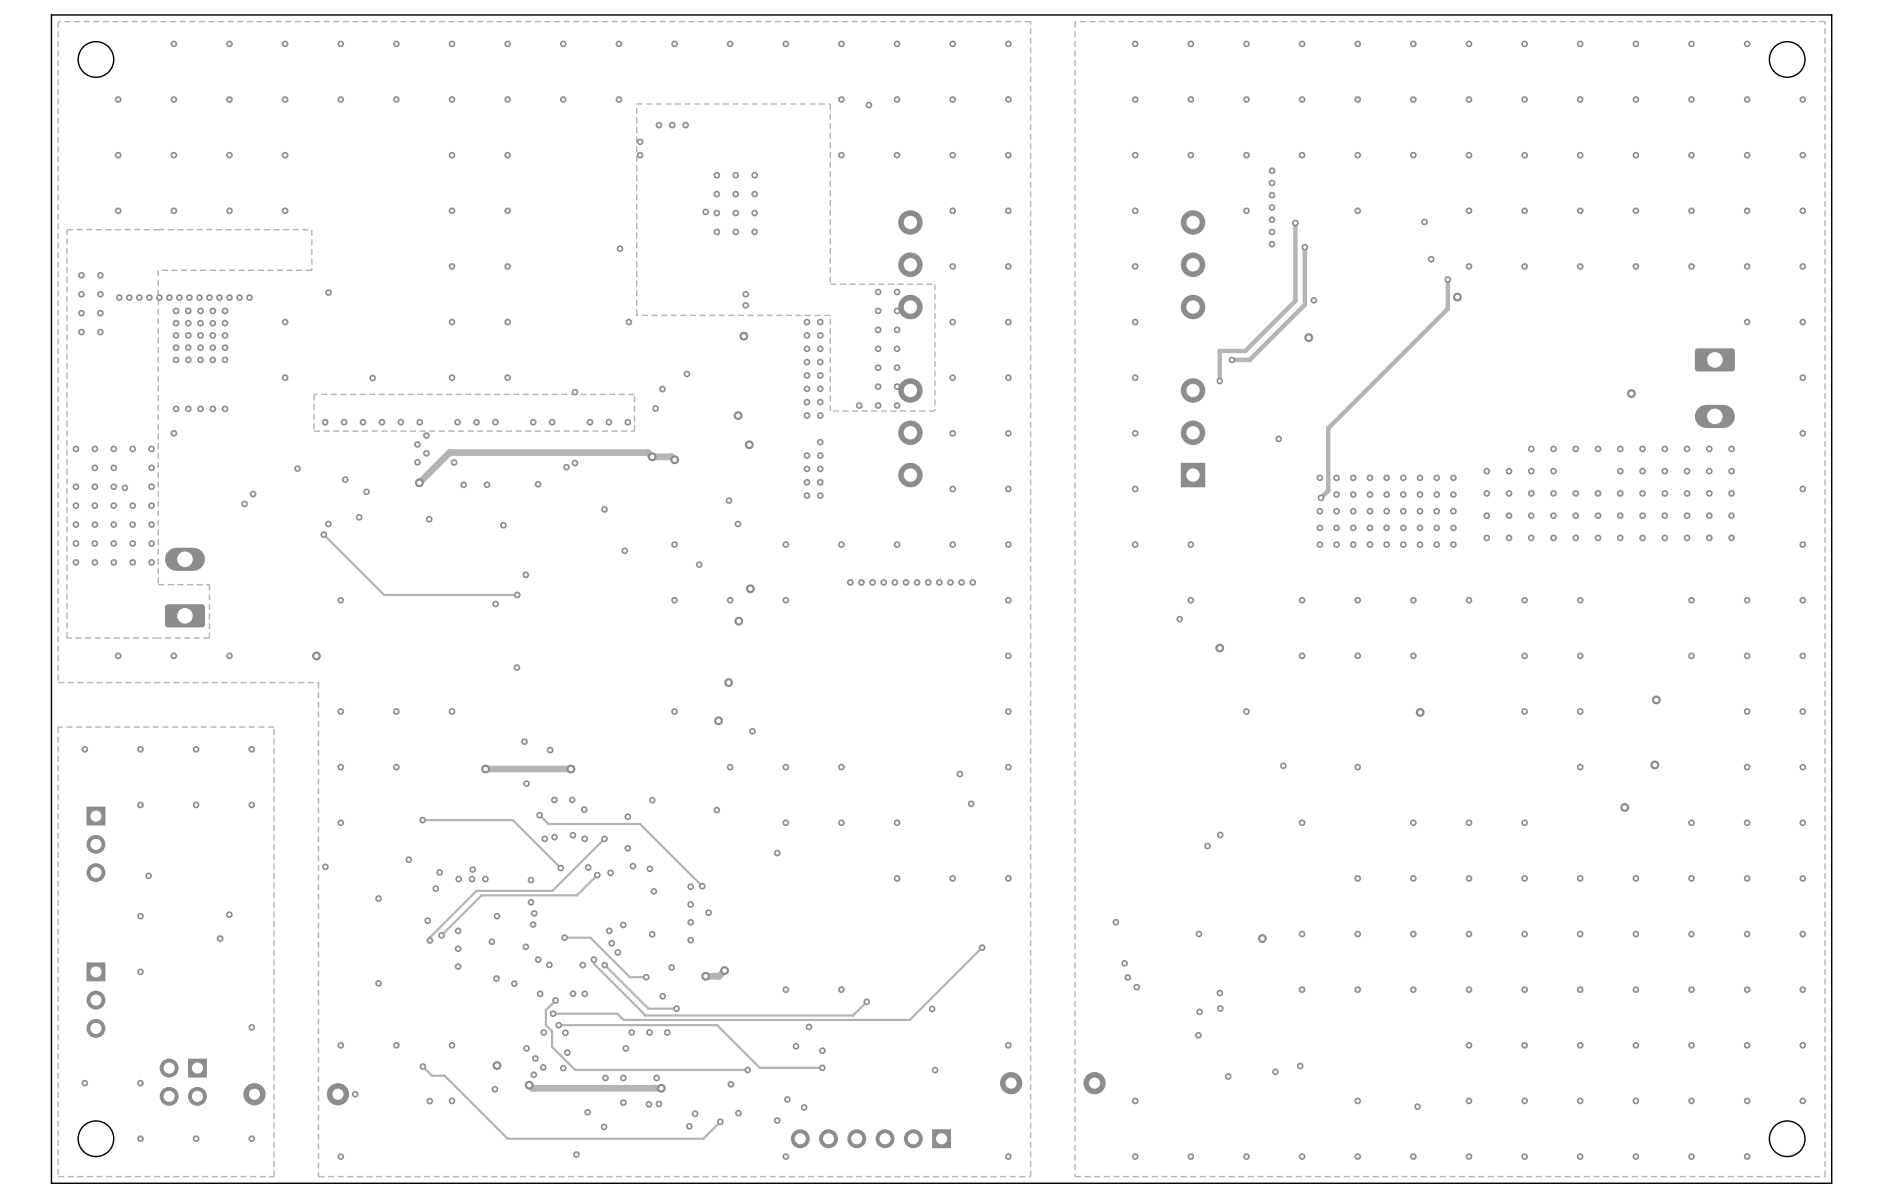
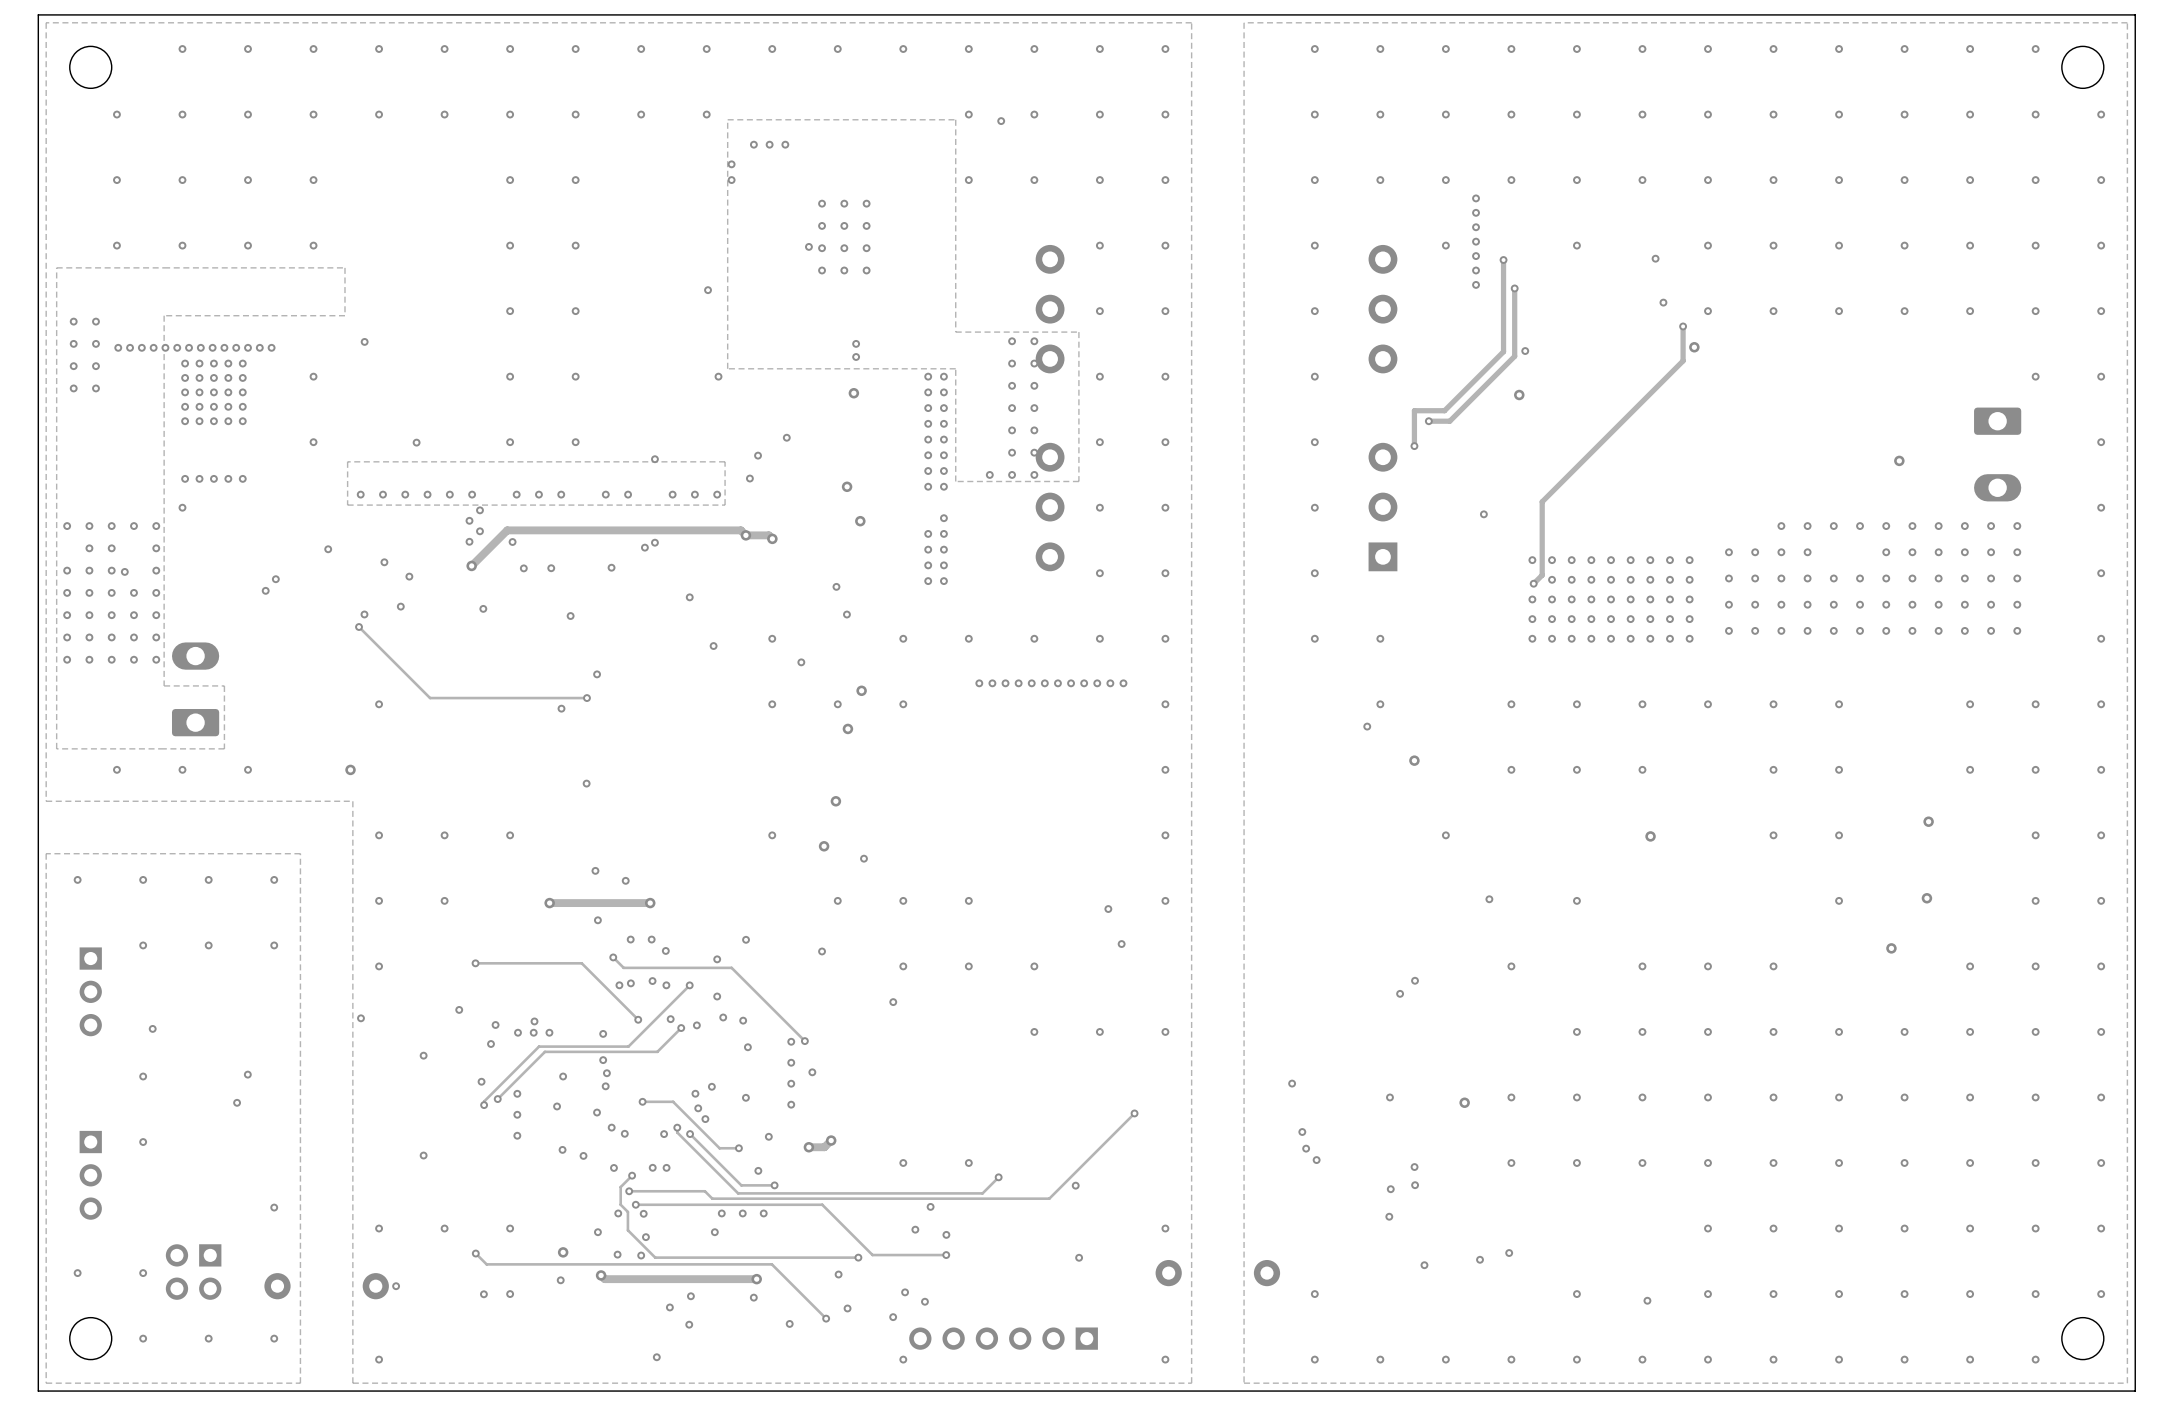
via: (535, 1058) -> none
via: (533, 1074) -> none
track: (432, 1075) (444, 1075) (507, 1138) (703, 1138) (720, 1121) -> (486, 1264) (771, 1264) (826, 1318)
via: (605, 1078) -> none
via: (623, 1078) -> none
via: (656, 1078) -> none
via: none -> (690, 1296)
via: (623, 1102) -> none
via: (648, 1104) -> none
via: (695, 1113) -> none

